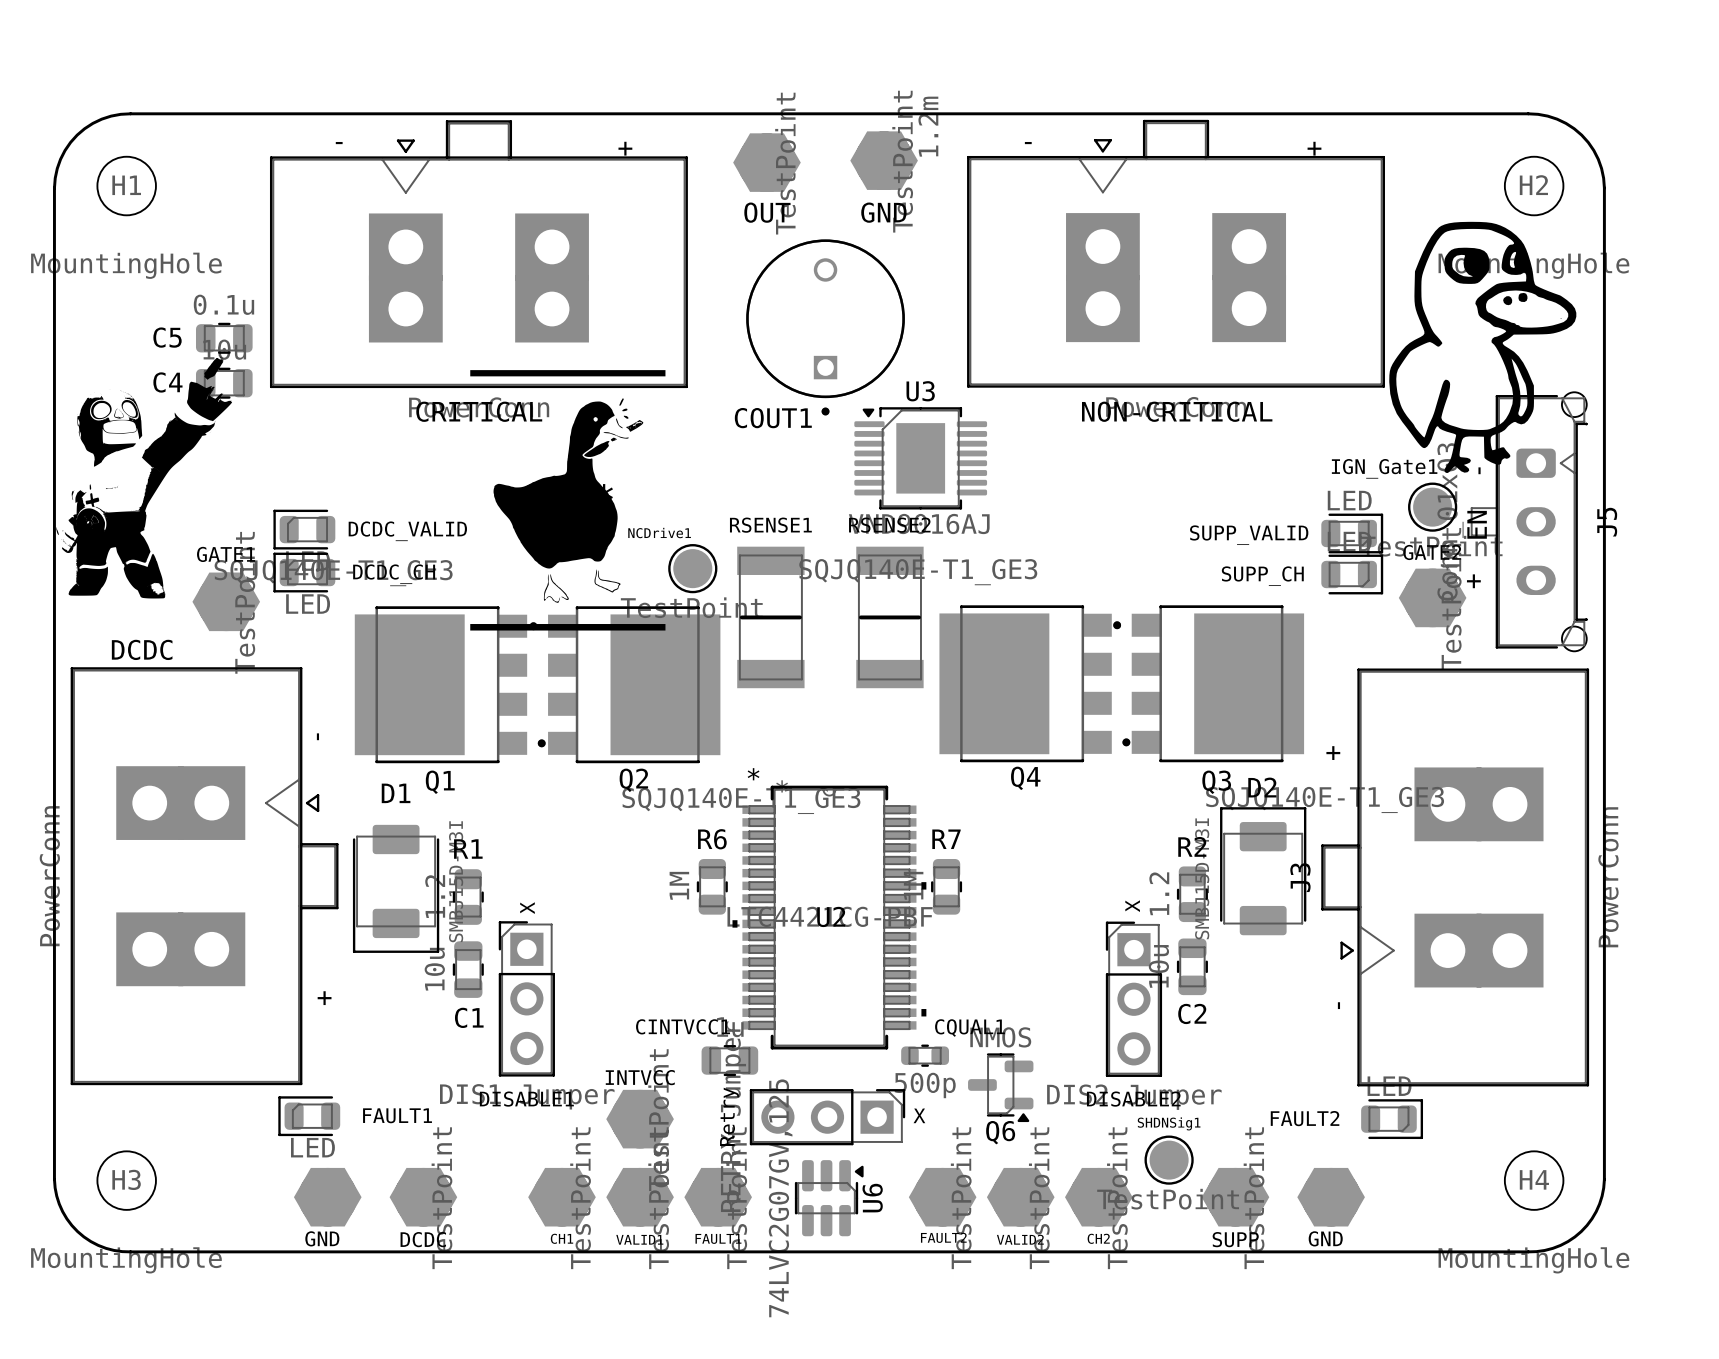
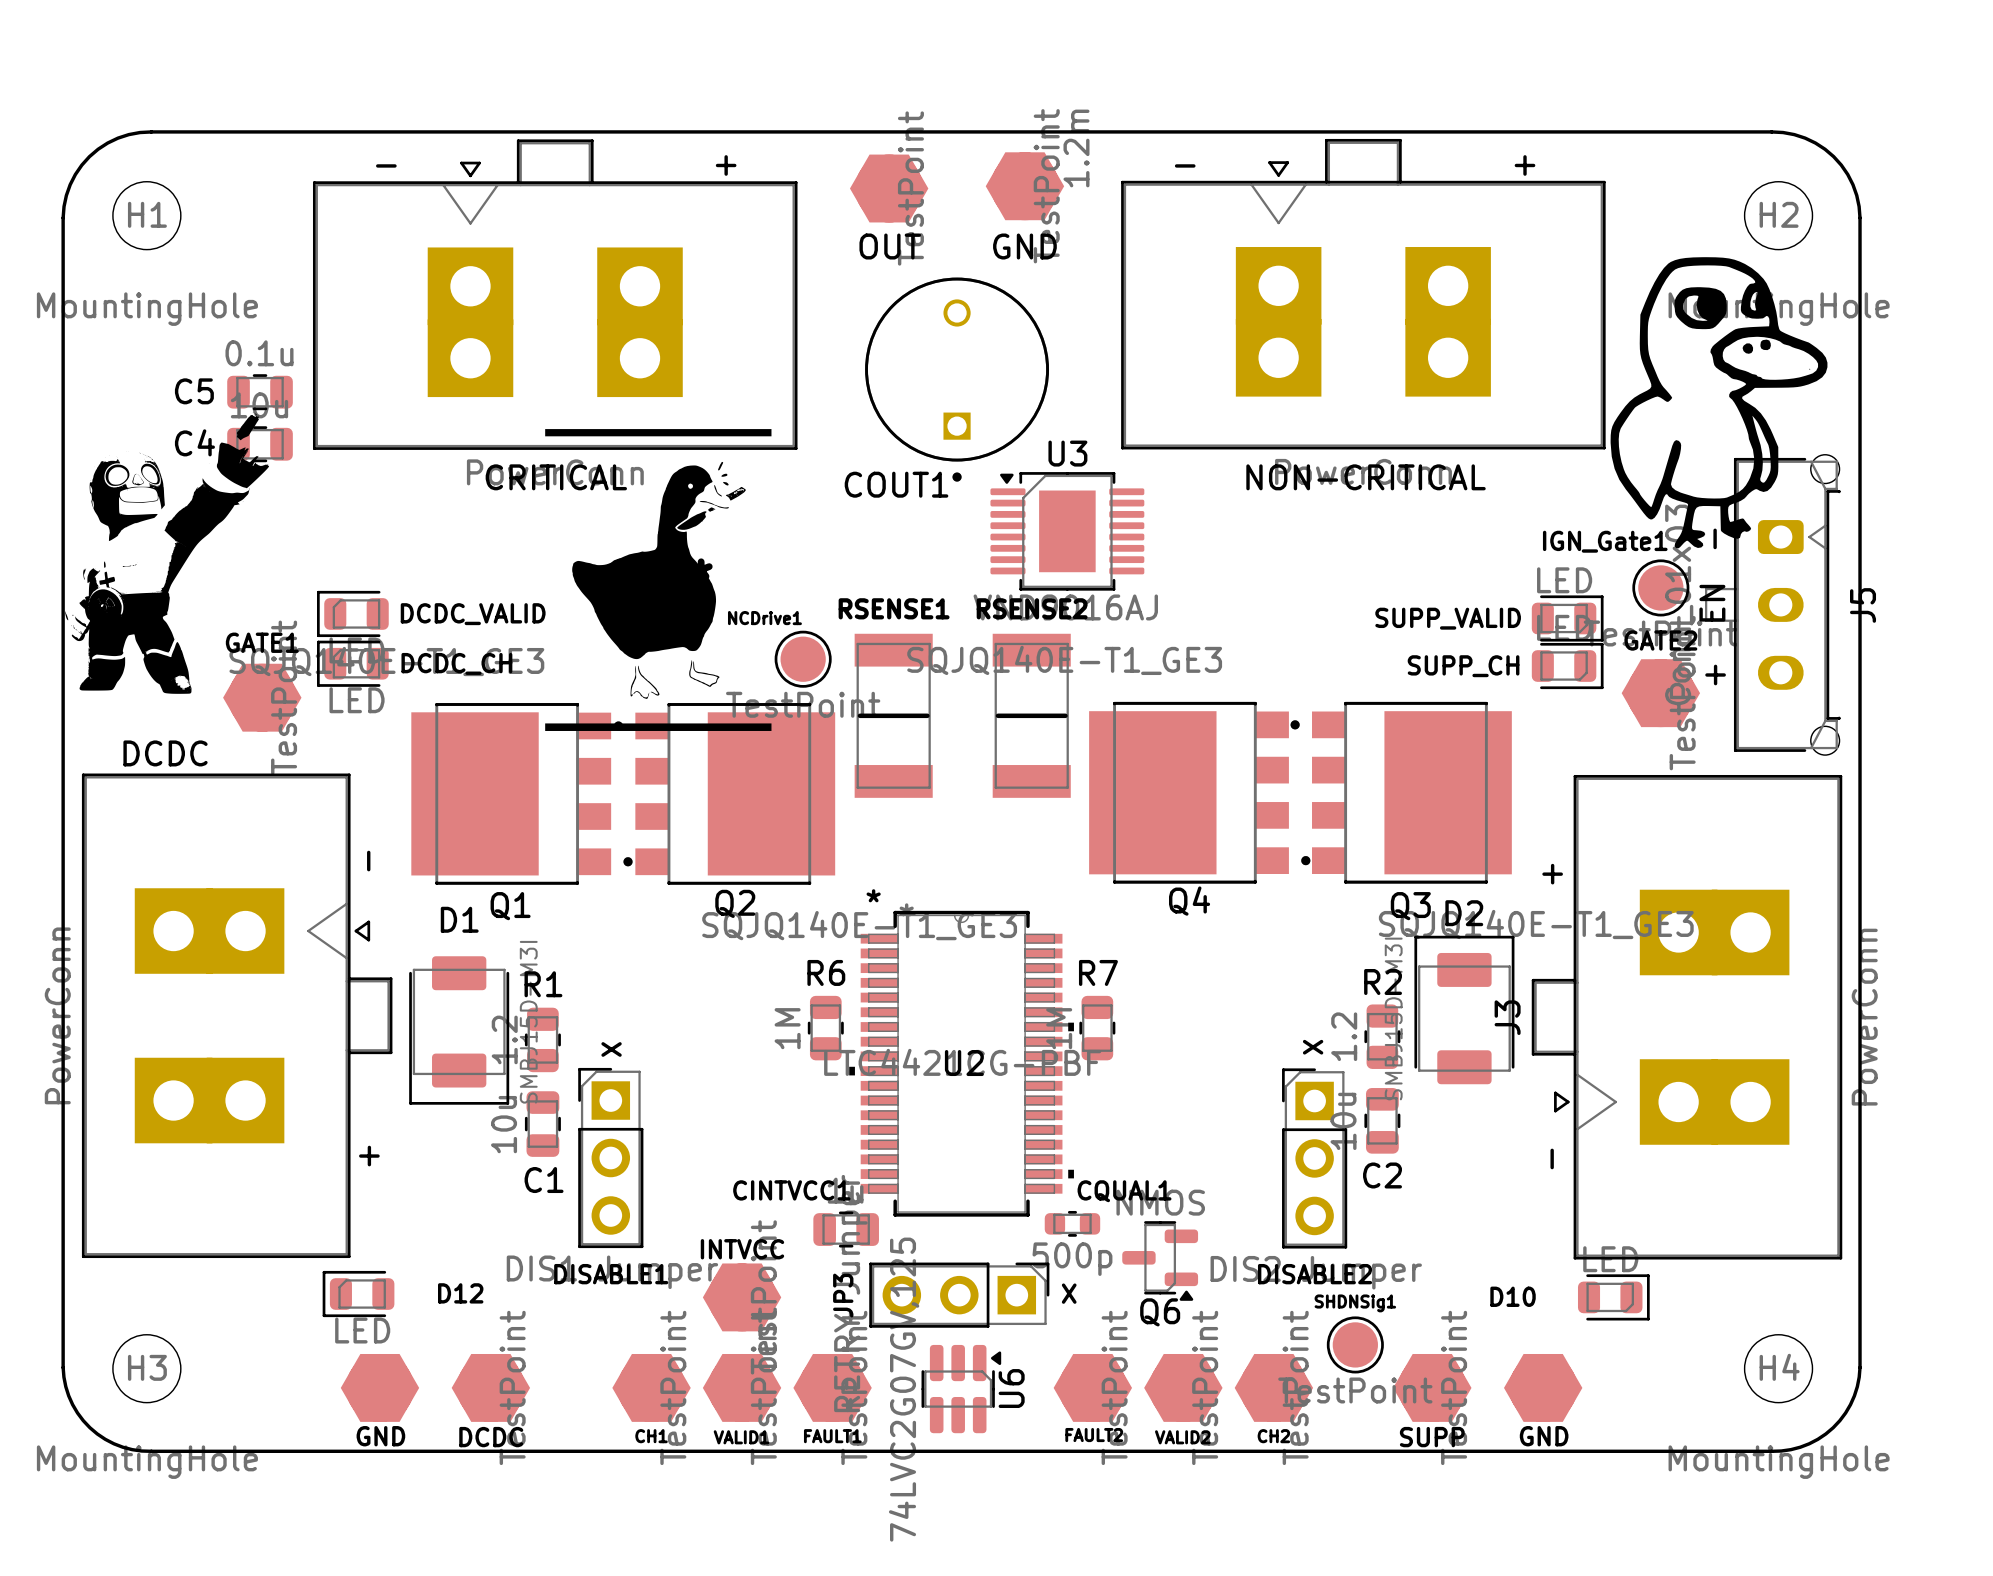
FAULT1 name: FAULT1 (397, 1115) -> D12 (460, 1293)
Retry name: Retry (729, 1116) -> JP3 (843, 1295)
FAULT2 name: FAULT2 (1305, 1118) -> D10 (1513, 1296)

